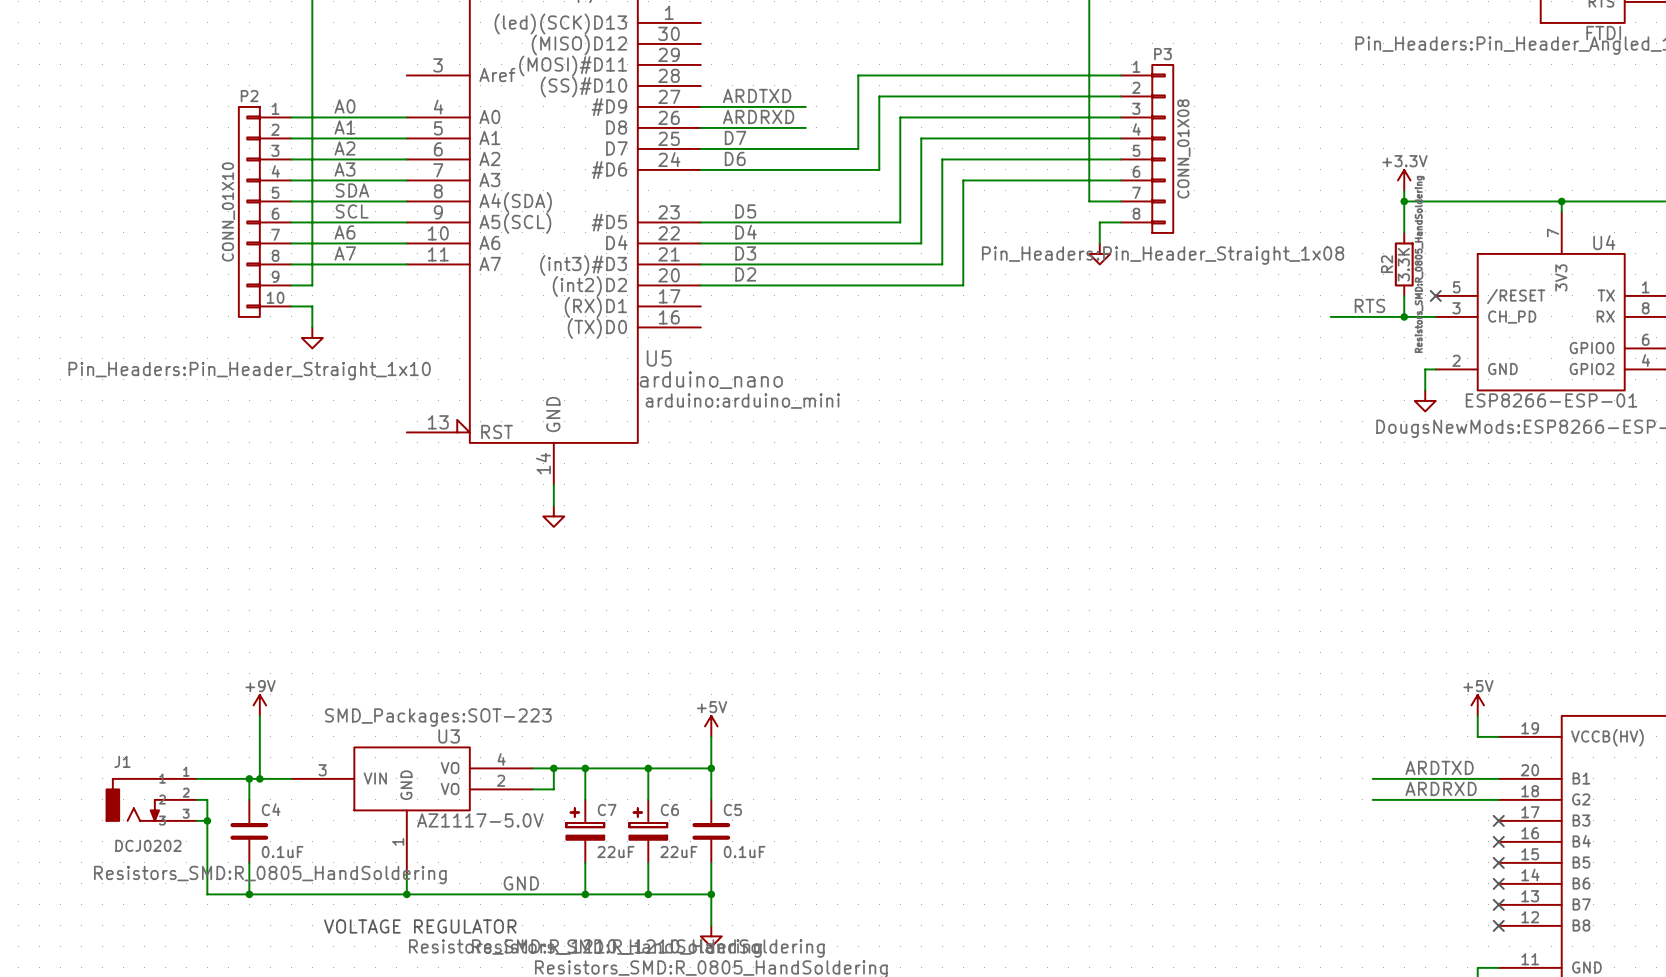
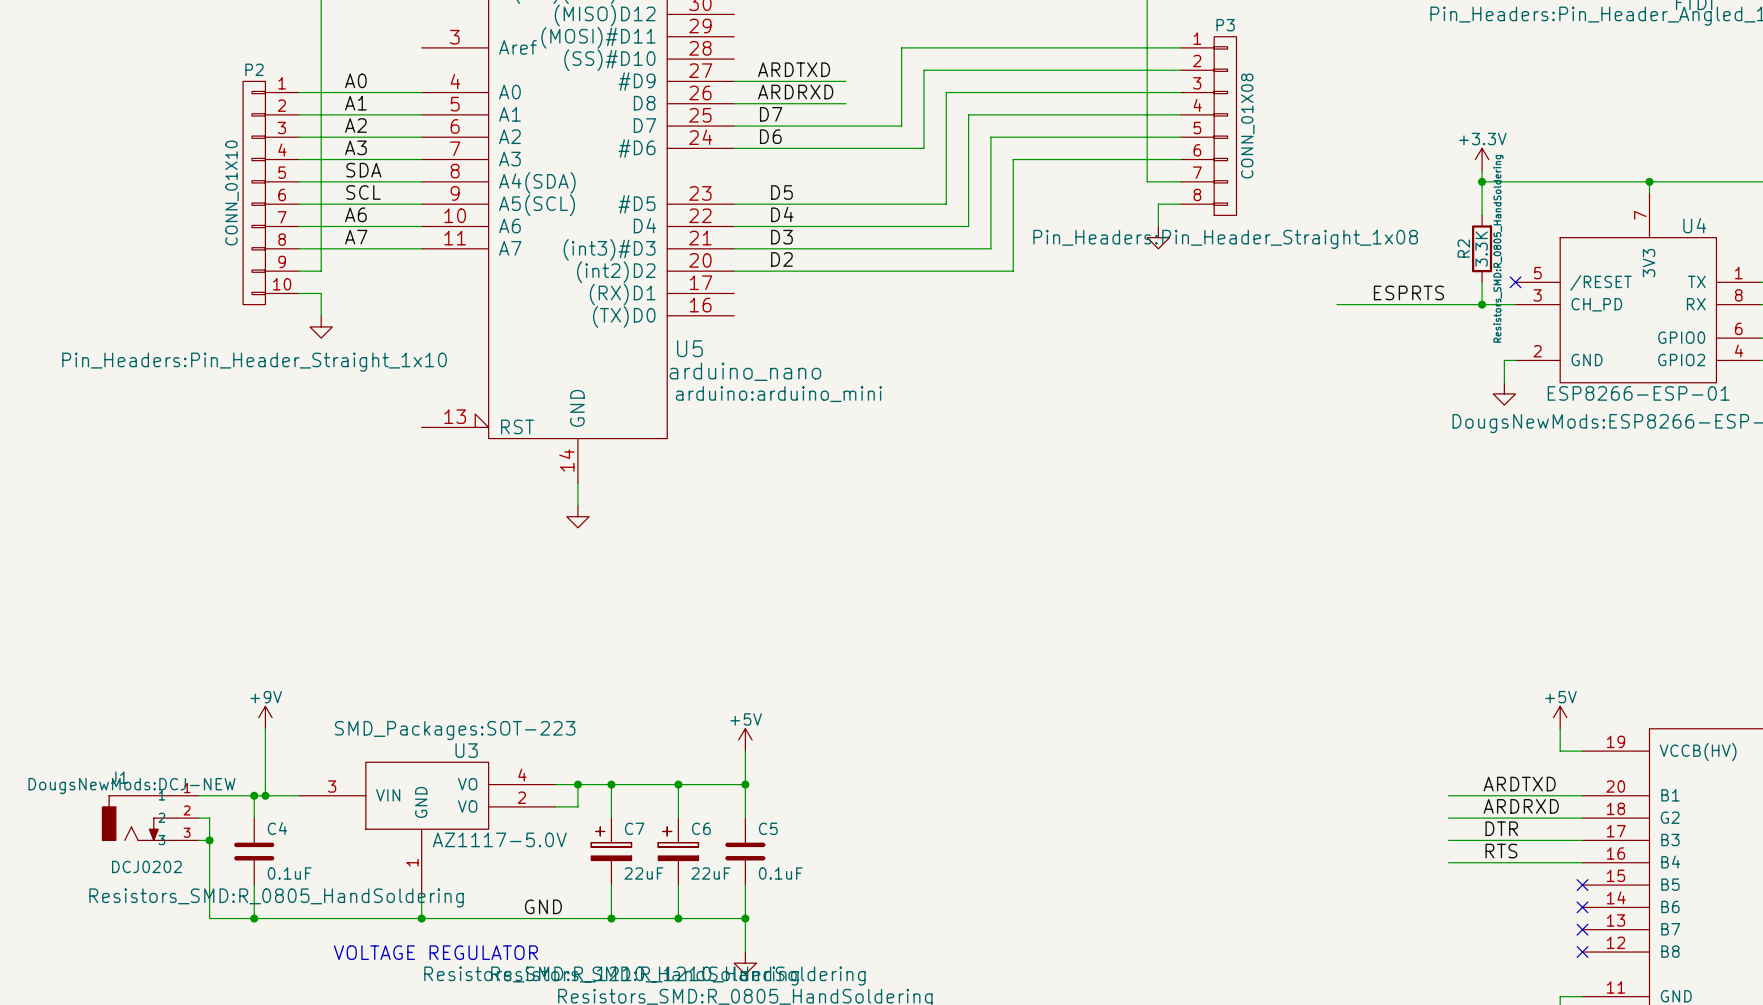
label: RTS (1369, 305) -> ESPRTS (1408, 292)
wire: none -> (1336, 304) (1403, 304)
J1 text: none -> DougsNewMods:DCJ-NEW (131, 786)
label: none -> DTR (1501, 828)
wire: none -> (1448, 840) (1582, 840)
no-connect mark: (1498, 820) -> none
label: none -> RTS (1501, 851)
wire: none -> (1448, 862) (1582, 862)
no-connect mark: (1498, 841) -> none

